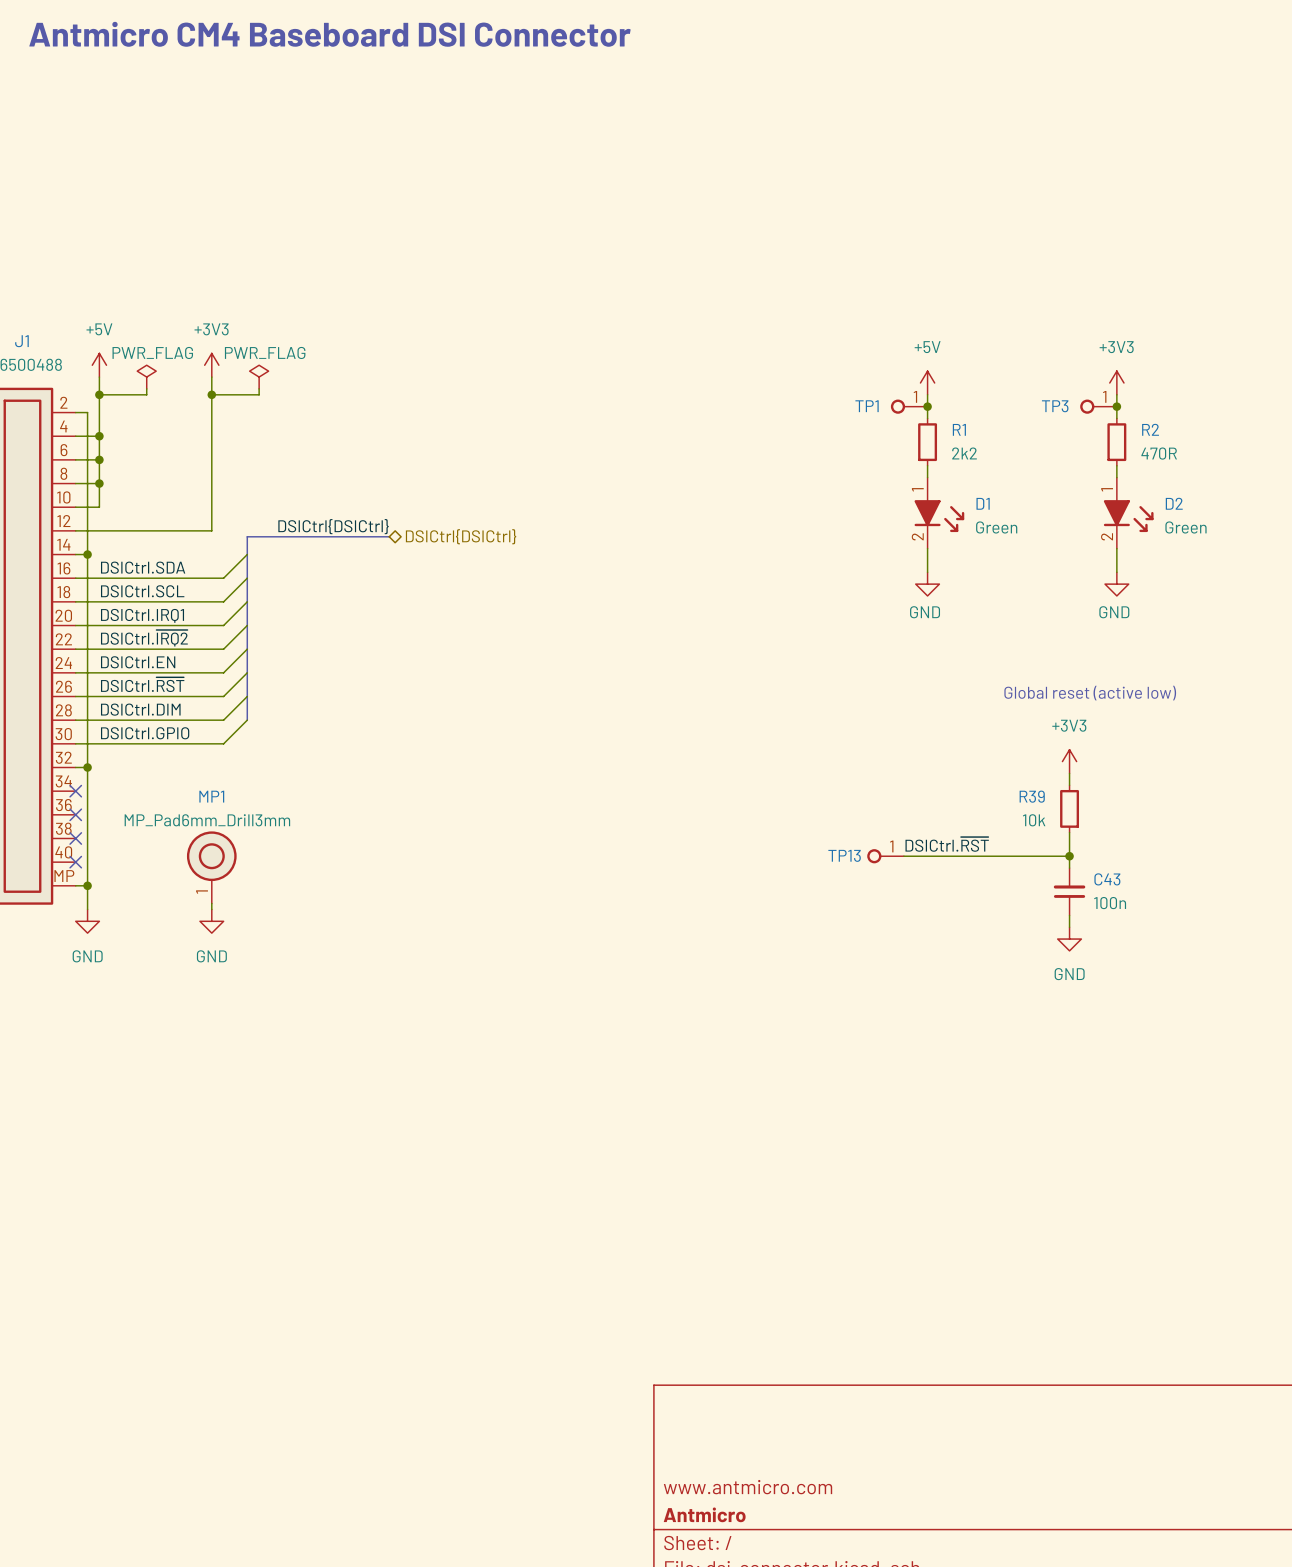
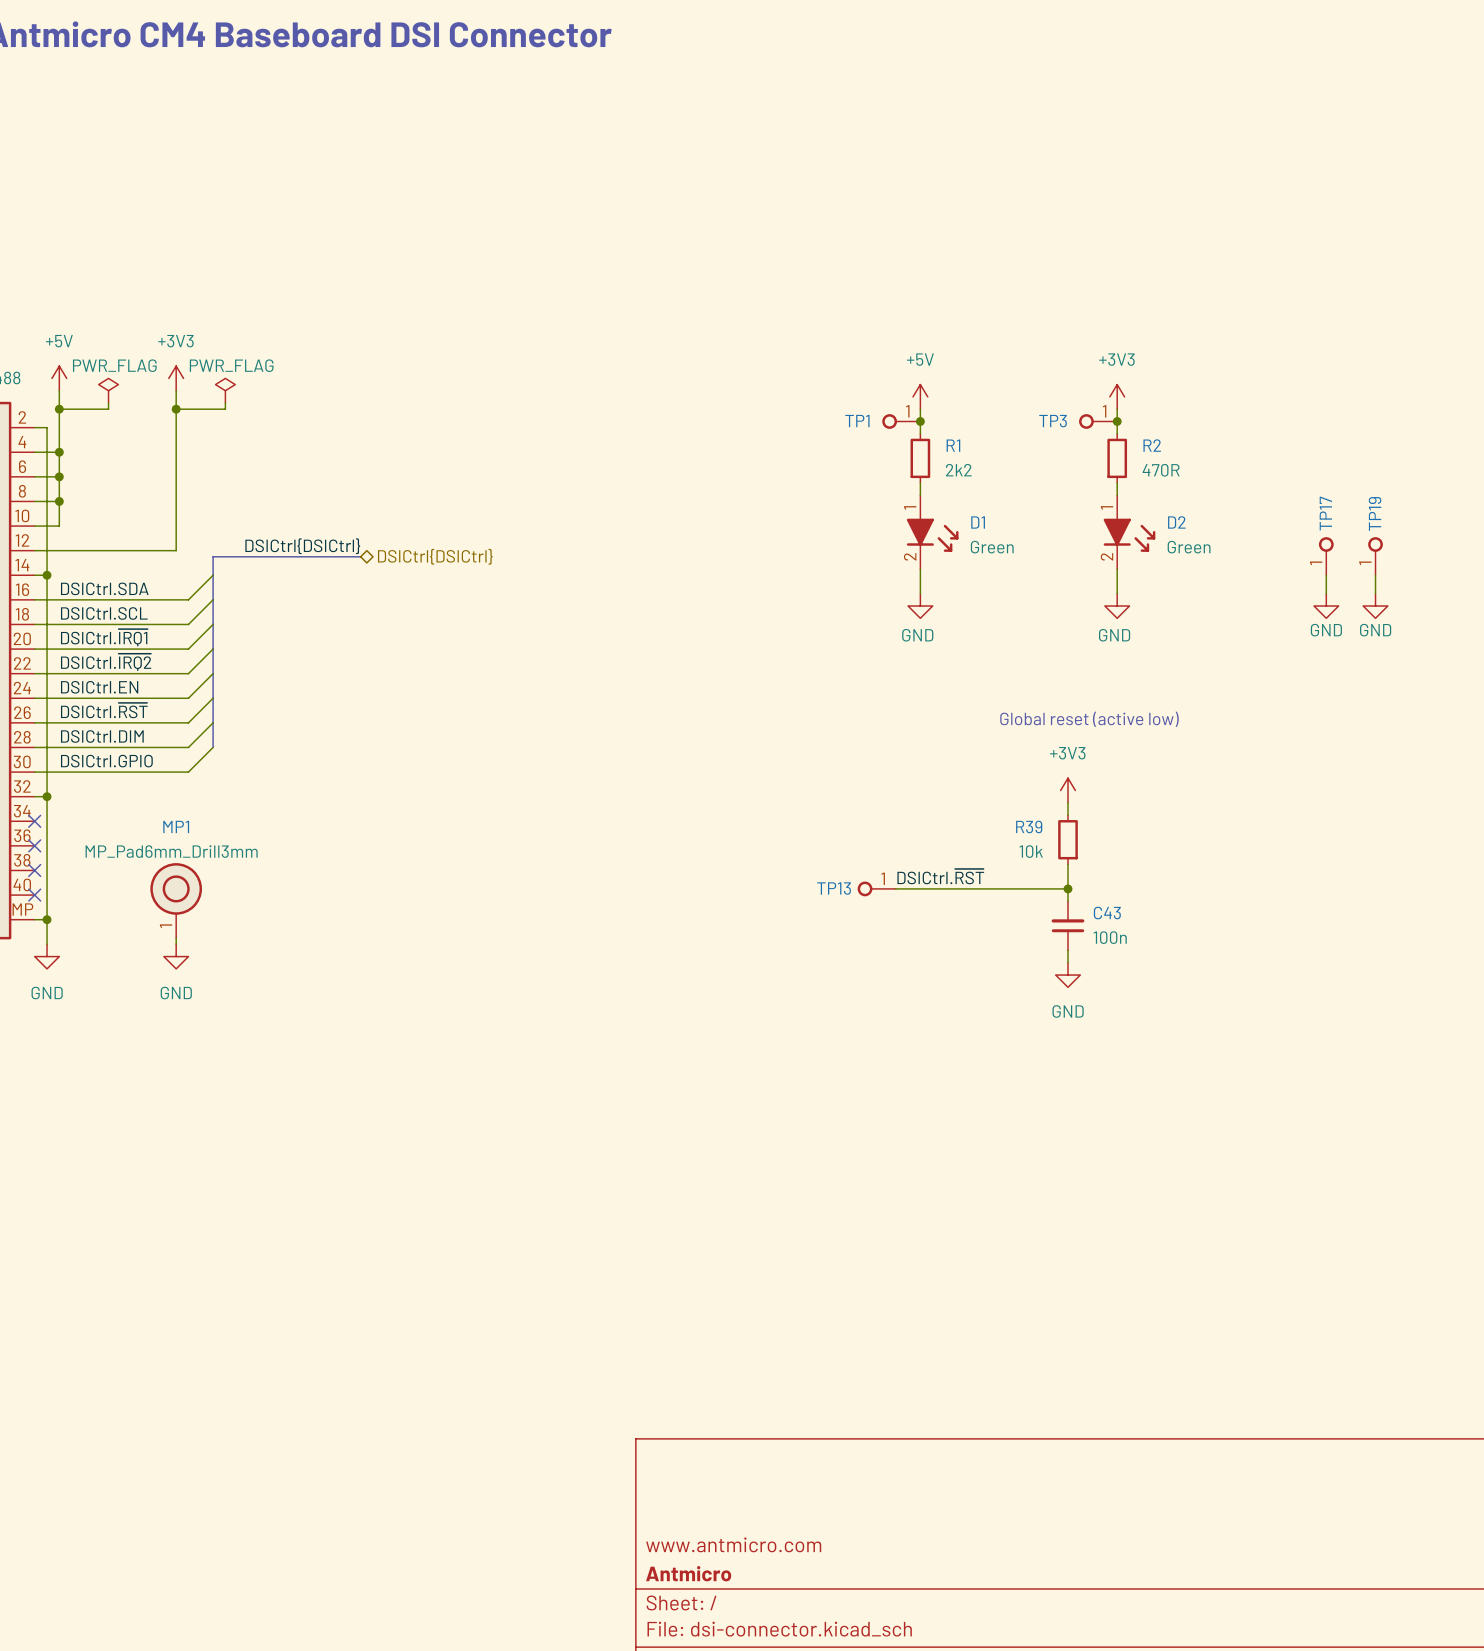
label: DSICtrl.IRQ1 (142, 615) -> DSICtrl.~{IRQ1} (104, 637)

